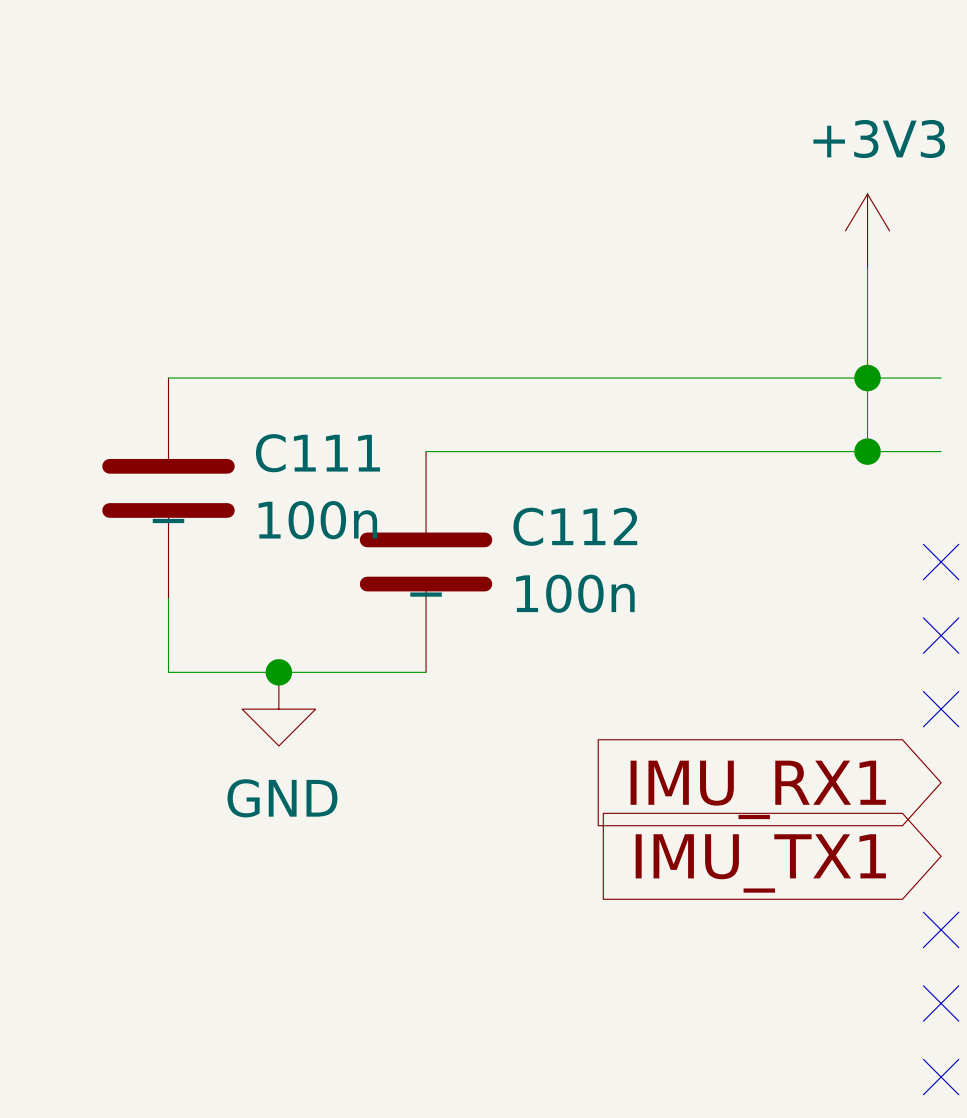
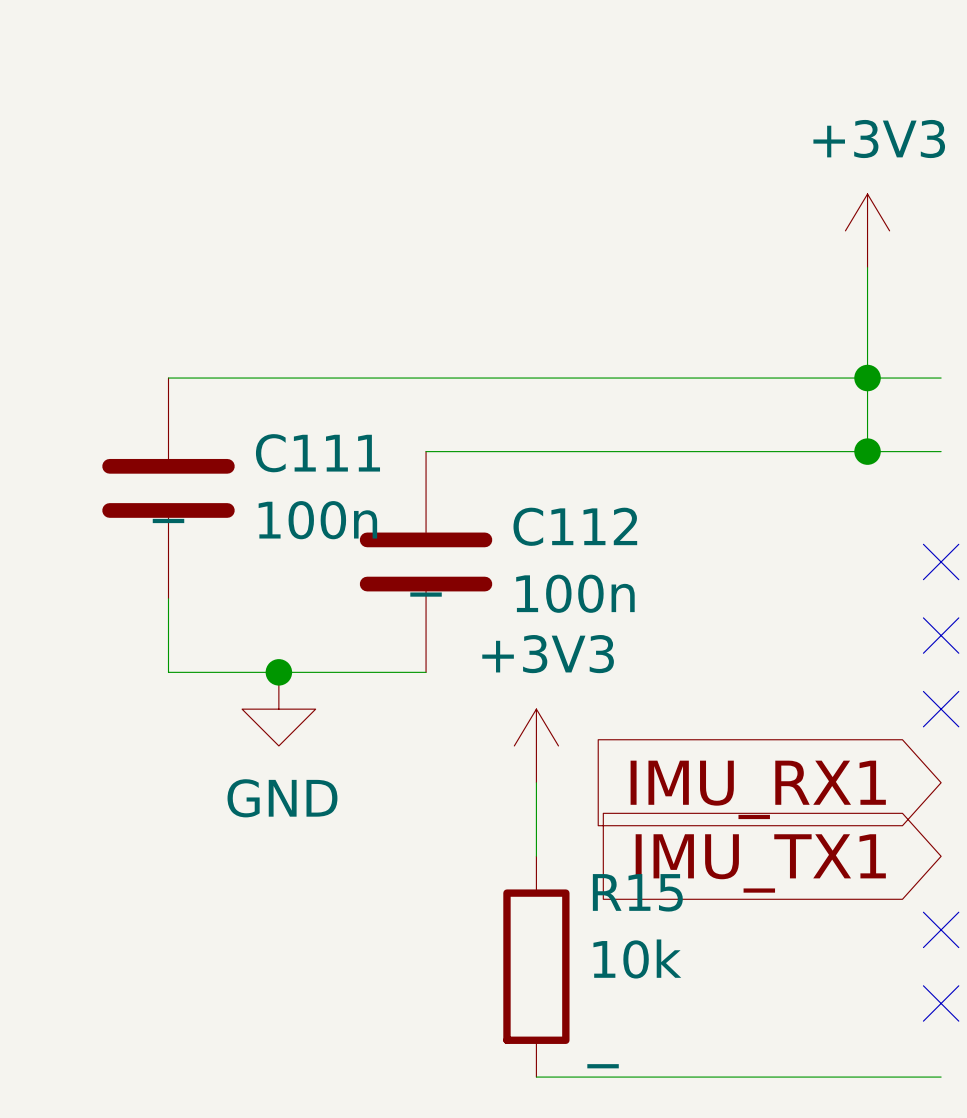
power symbol: none -> +3V3 (536, 745)
wire: none -> (536, 782) (536, 856)
R15: none -> 10k (536, 966)
wire: none -> (536, 1077) (941, 1077)
no-connect mark: (941, 1077) -> none

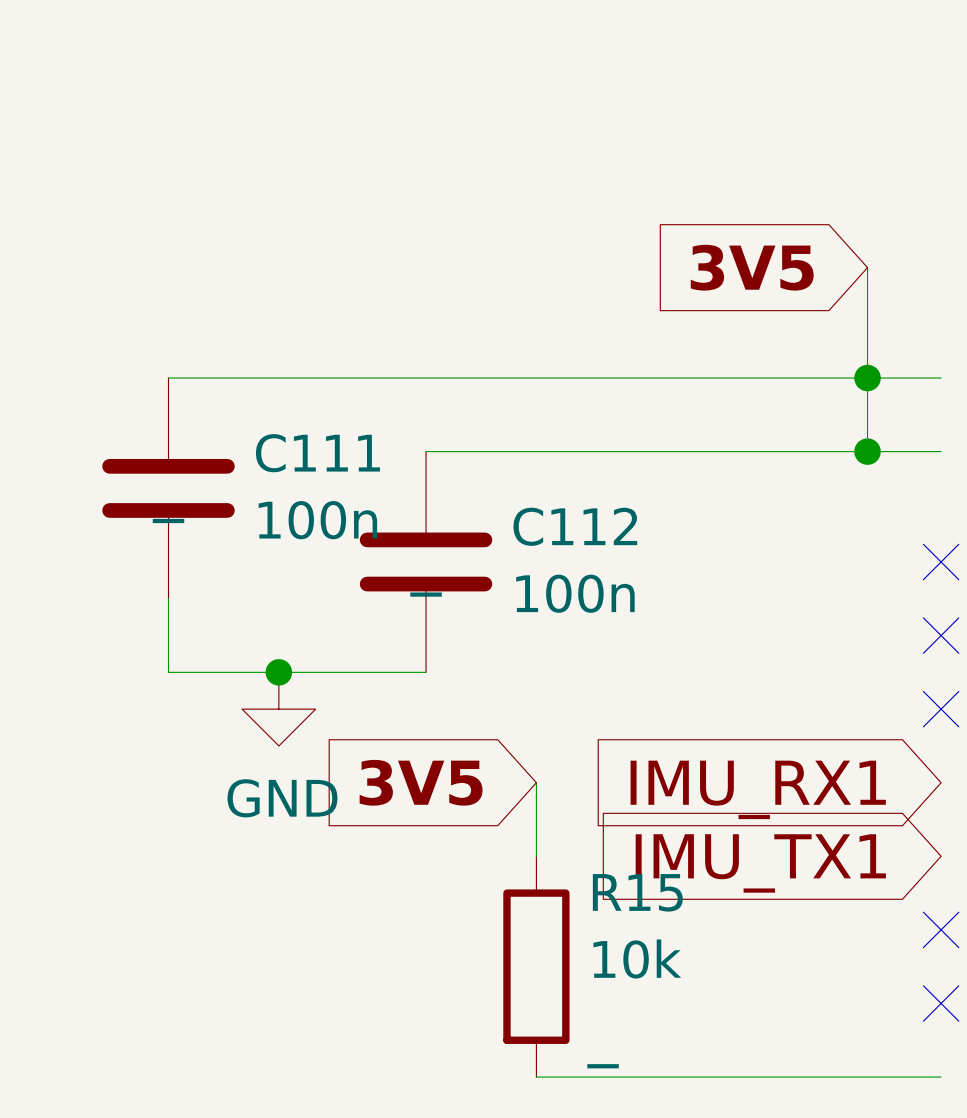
power symbol: +3V3 (867, 230) -> none
global label: none -> 3V5 (752, 267)
power symbol: +3V3 (536, 745) -> none
global label: none -> 3V5 (421, 782)

